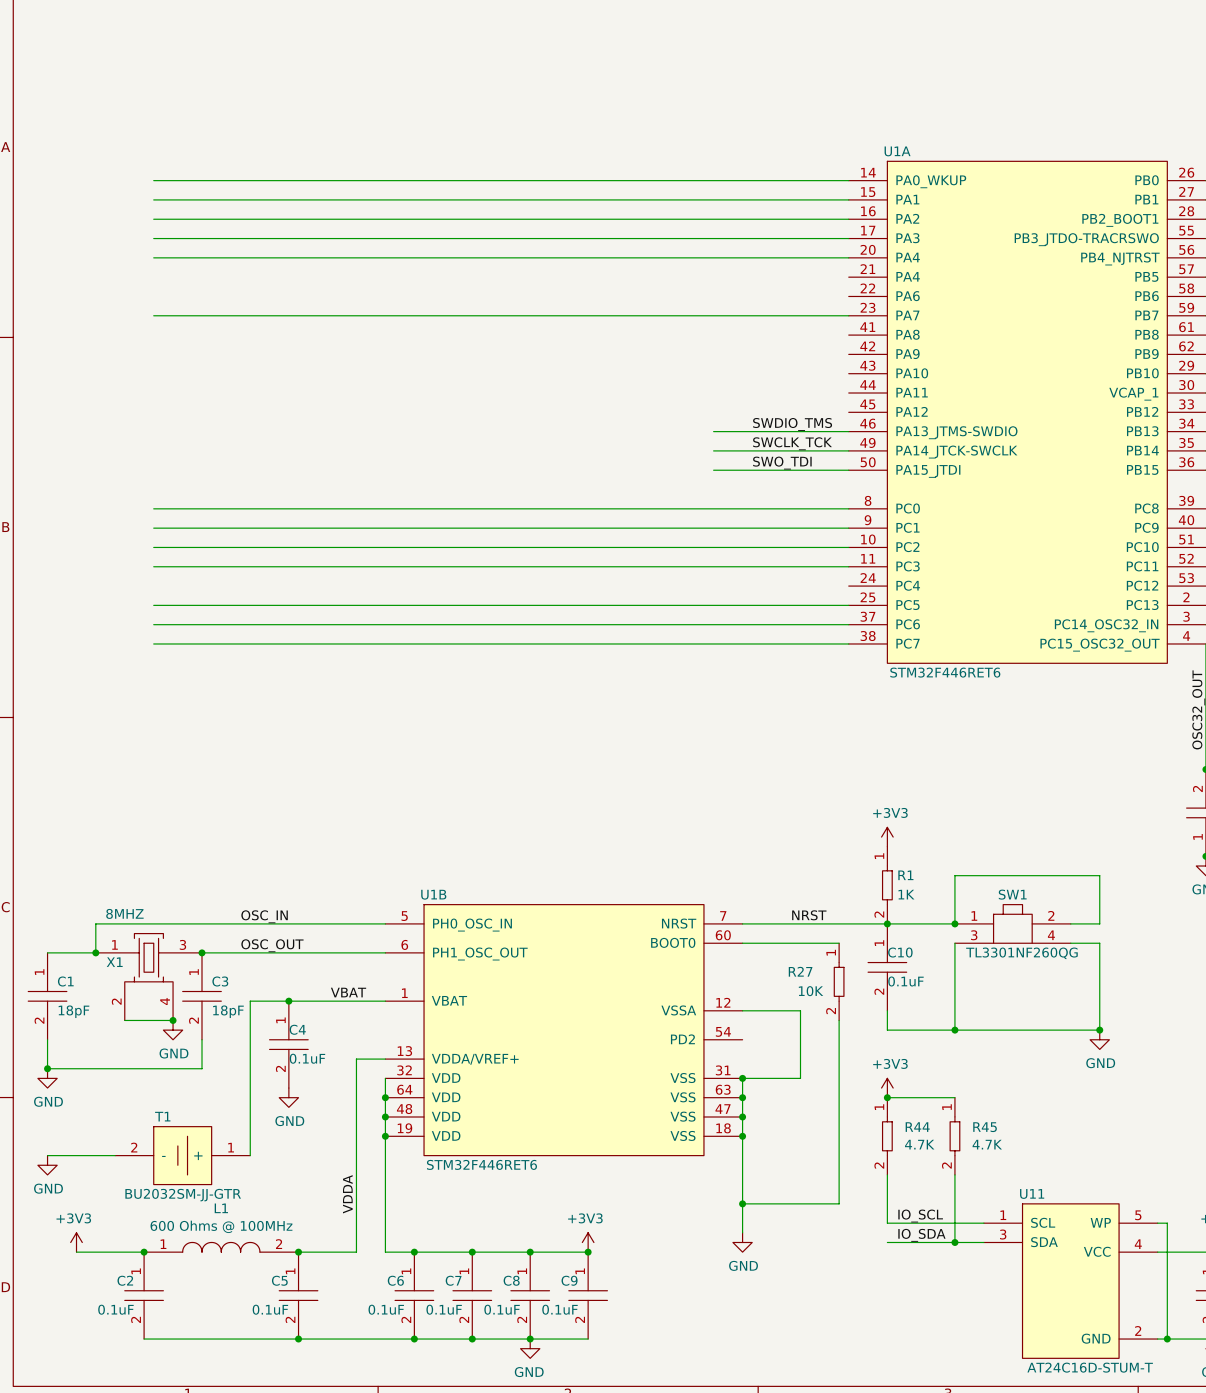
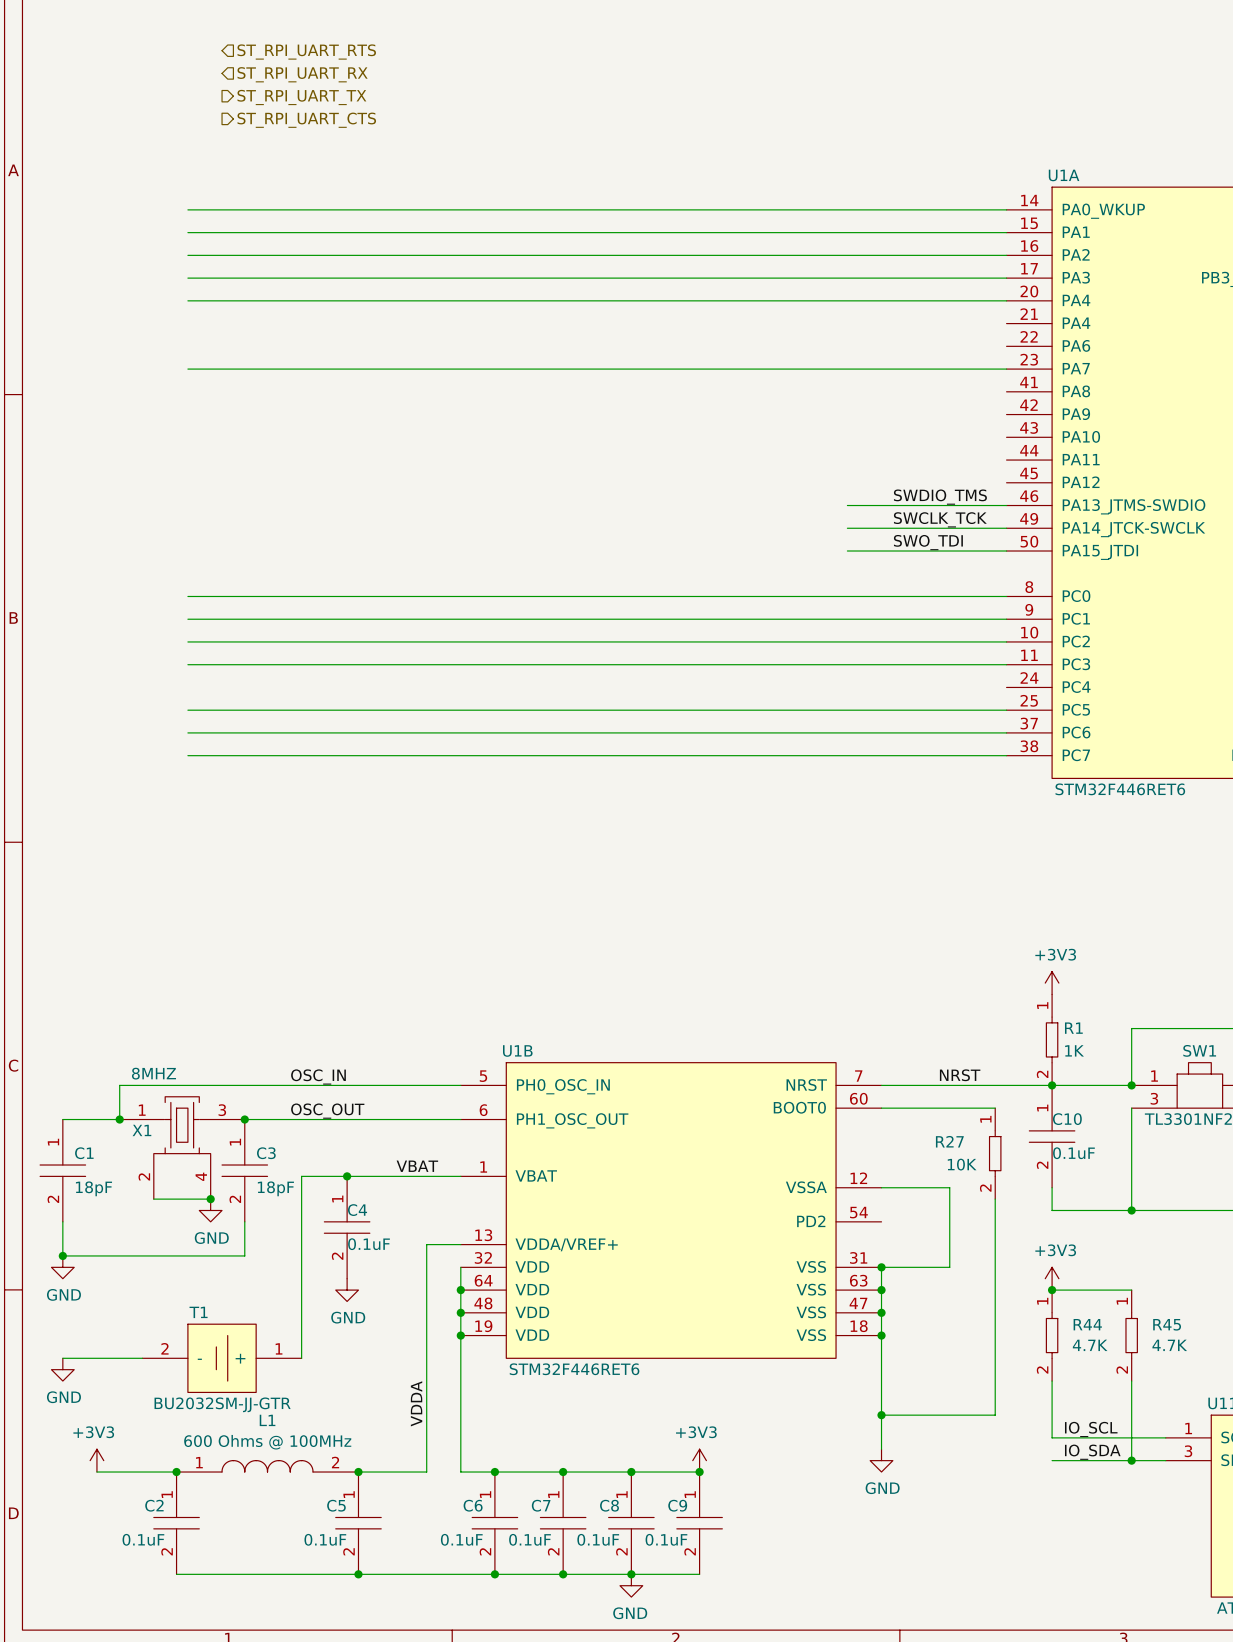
hierarchical label: none -> ST_RPI_UART_RTS (306, 52)
hierarchical label: none -> ST_RPI_UART_RX (302, 74)
hierarchical label: none -> ST_RPI_UART_TX (301, 97)
hierarchical label: none -> ST_RPI_UART_CTS (306, 120)

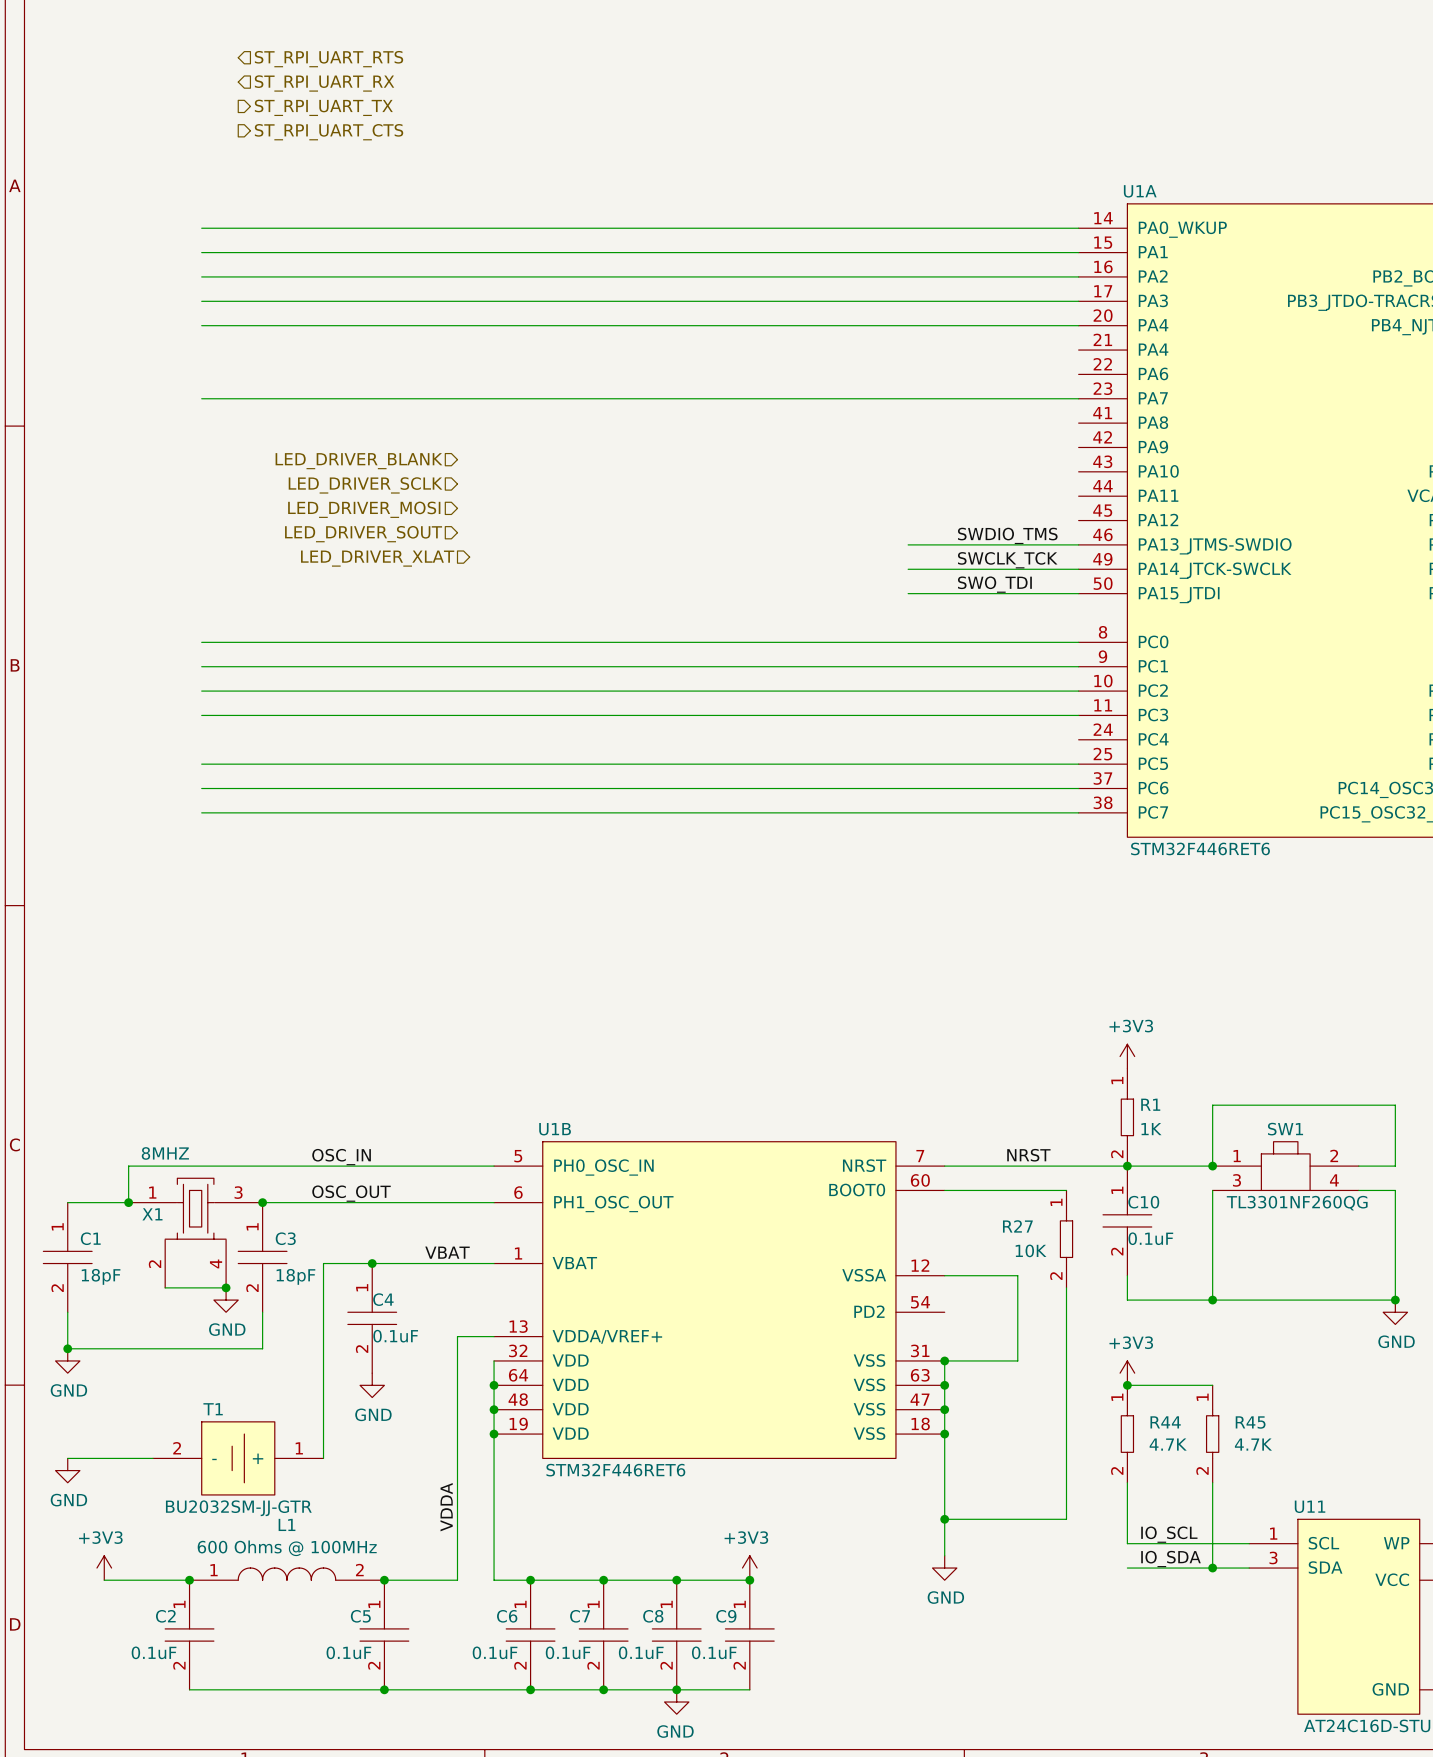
hierarchical label: none -> LED_DRIVER_BLANK (358, 461)
hierarchical label: none -> LED_DRIVER_SCLK (365, 485)
hierarchical label: none -> LED_DRIVER_MOSI (364, 509)
hierarchical label: none -> LED_DRIVER_SOUT (363, 534)
hierarchical label: none -> LED_DRIVER_XLAT (377, 558)

